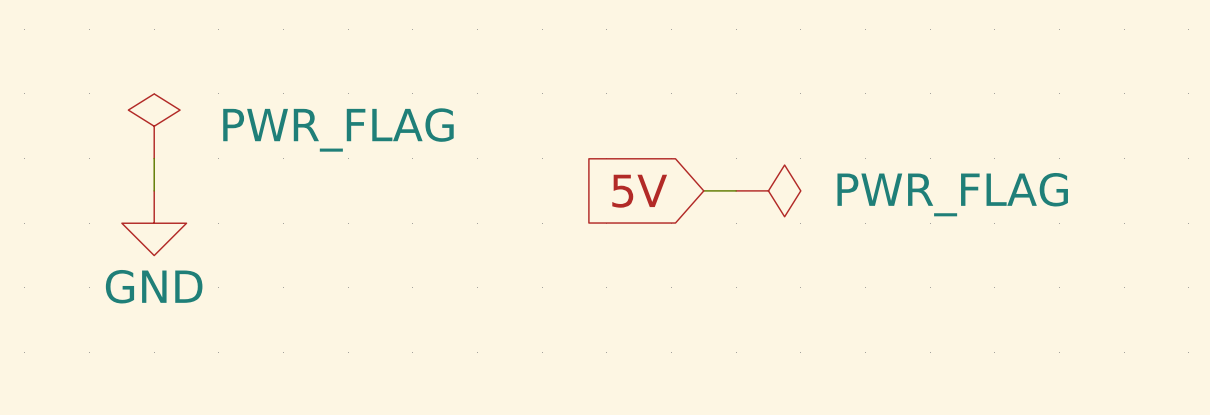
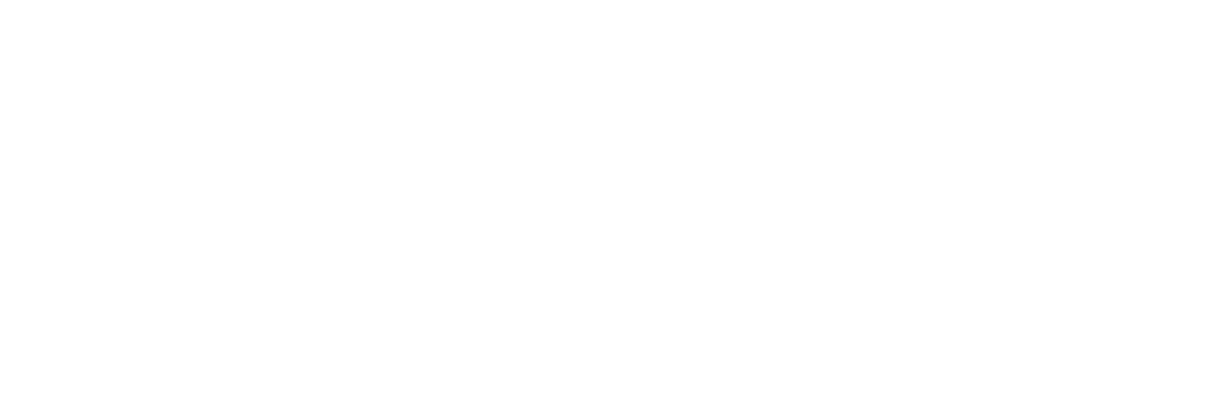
power symbol: PWR_FLAG (154, 126) -> none
wire: (154, 158) (154, 190) -> none
wire: (703, 190) (736, 190) -> none
power symbol: PWR_FLAG (768, 190) -> none
global label: 5V (639, 191) -> none
power symbol: GND (154, 223) -> none

